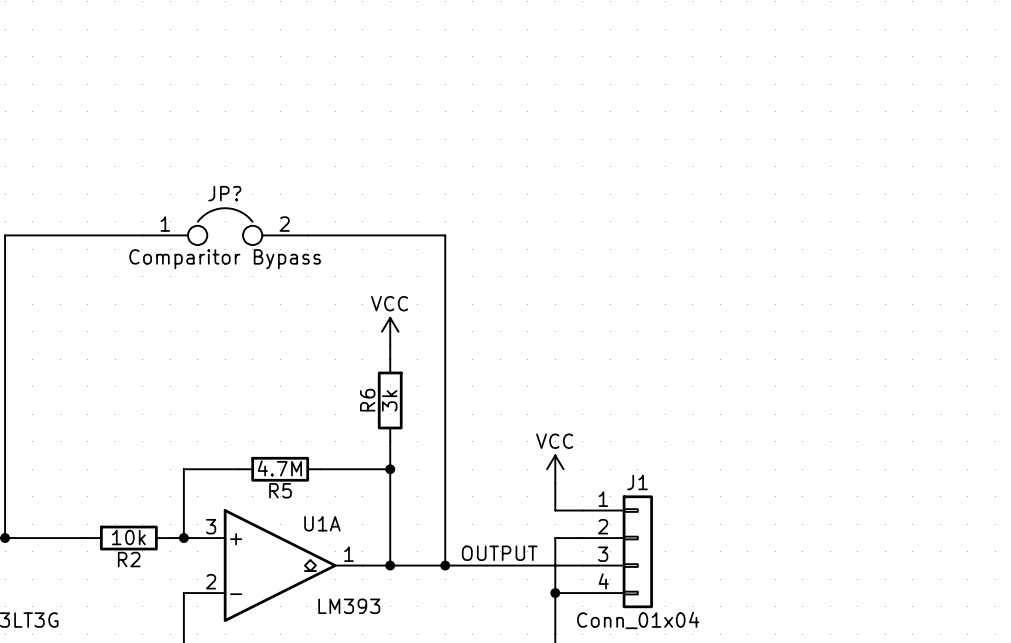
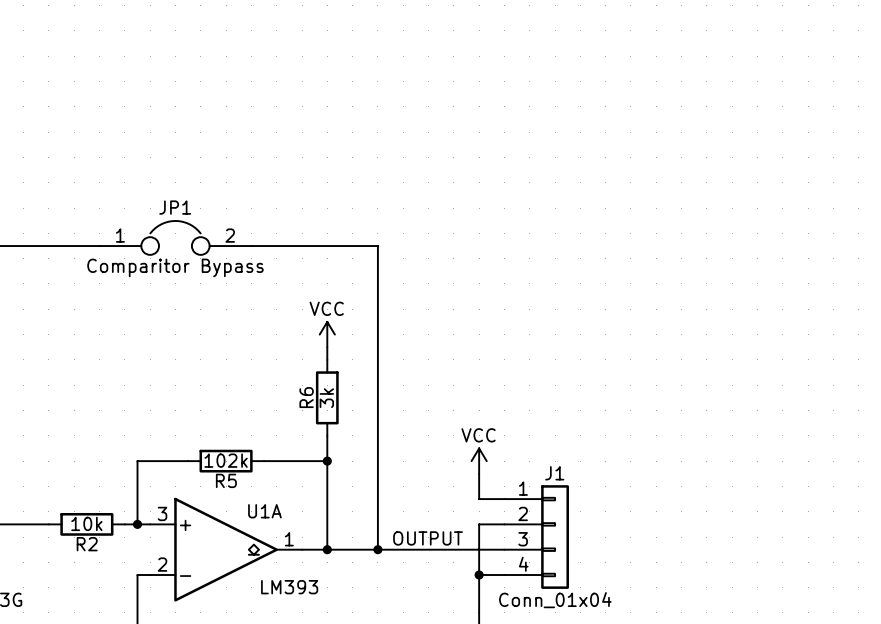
JP? name: JP? (224, 193) -> JP1 (175, 207)
R5 value: 4.7M (279, 468) -> 102k (226, 460)

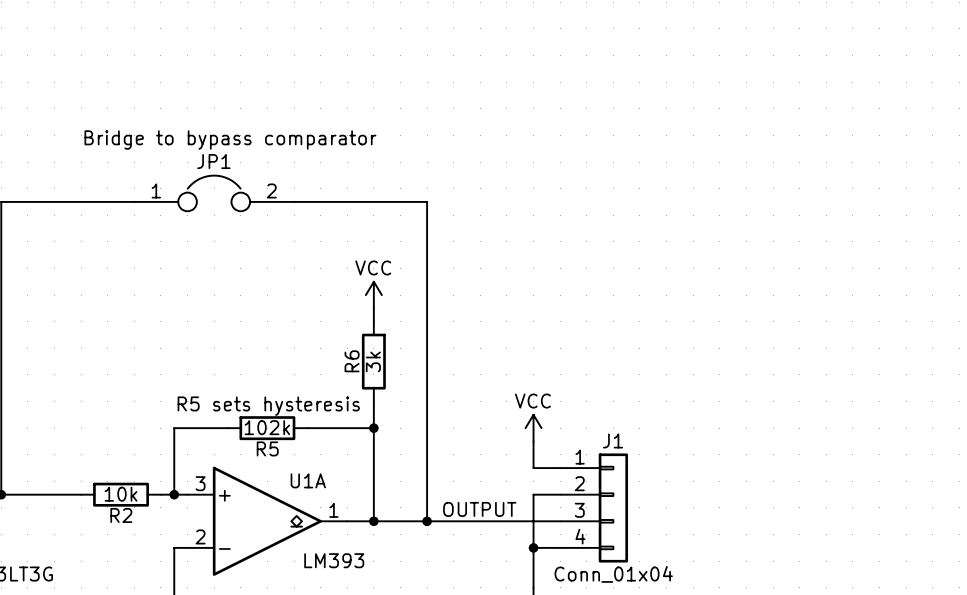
text: none -> Bridge to bypass comparator (230, 140)
JP1 value: Comparitor Bypass (175, 267) -> none
text: none -> R5 sets hysteresis (268, 406)

